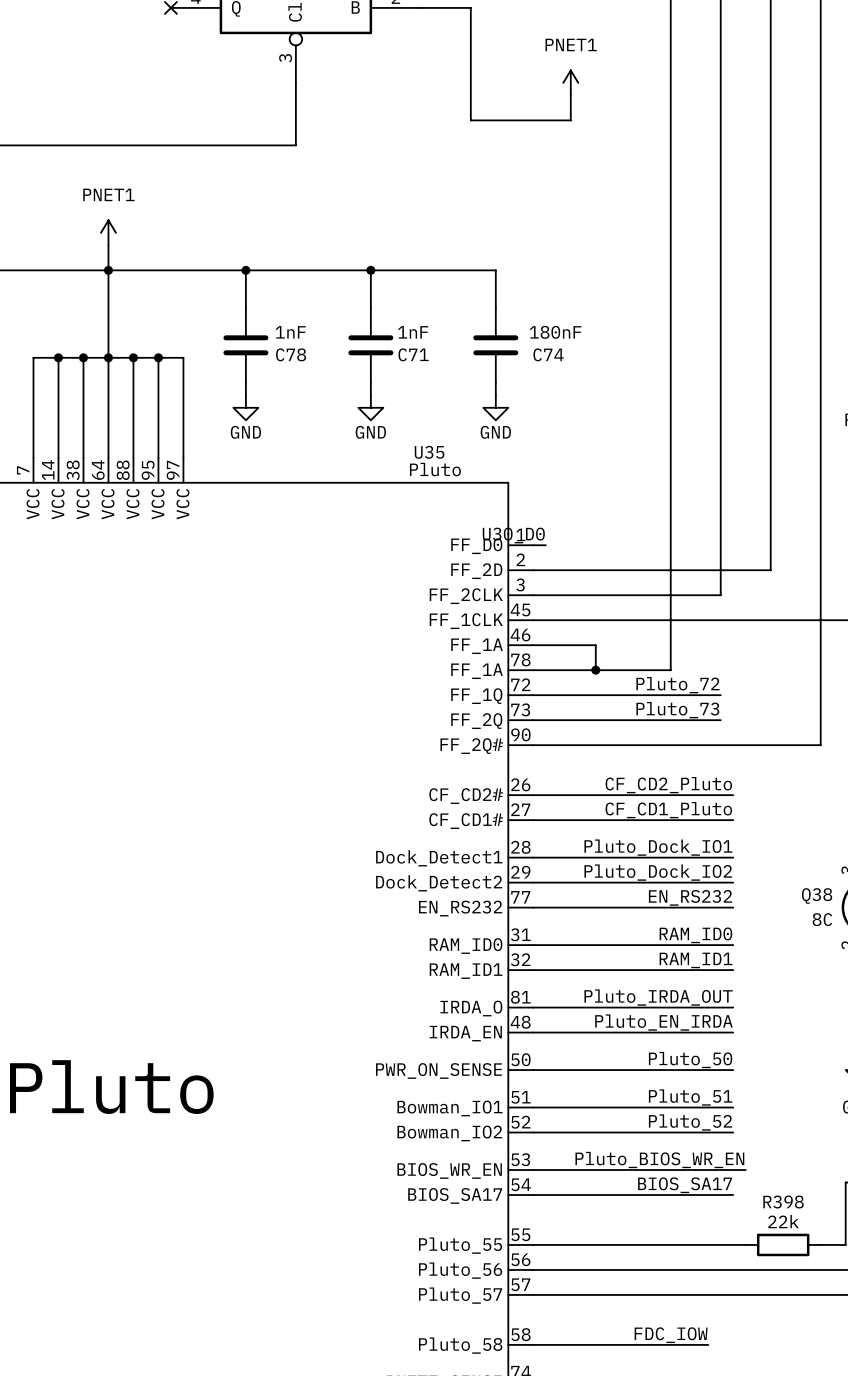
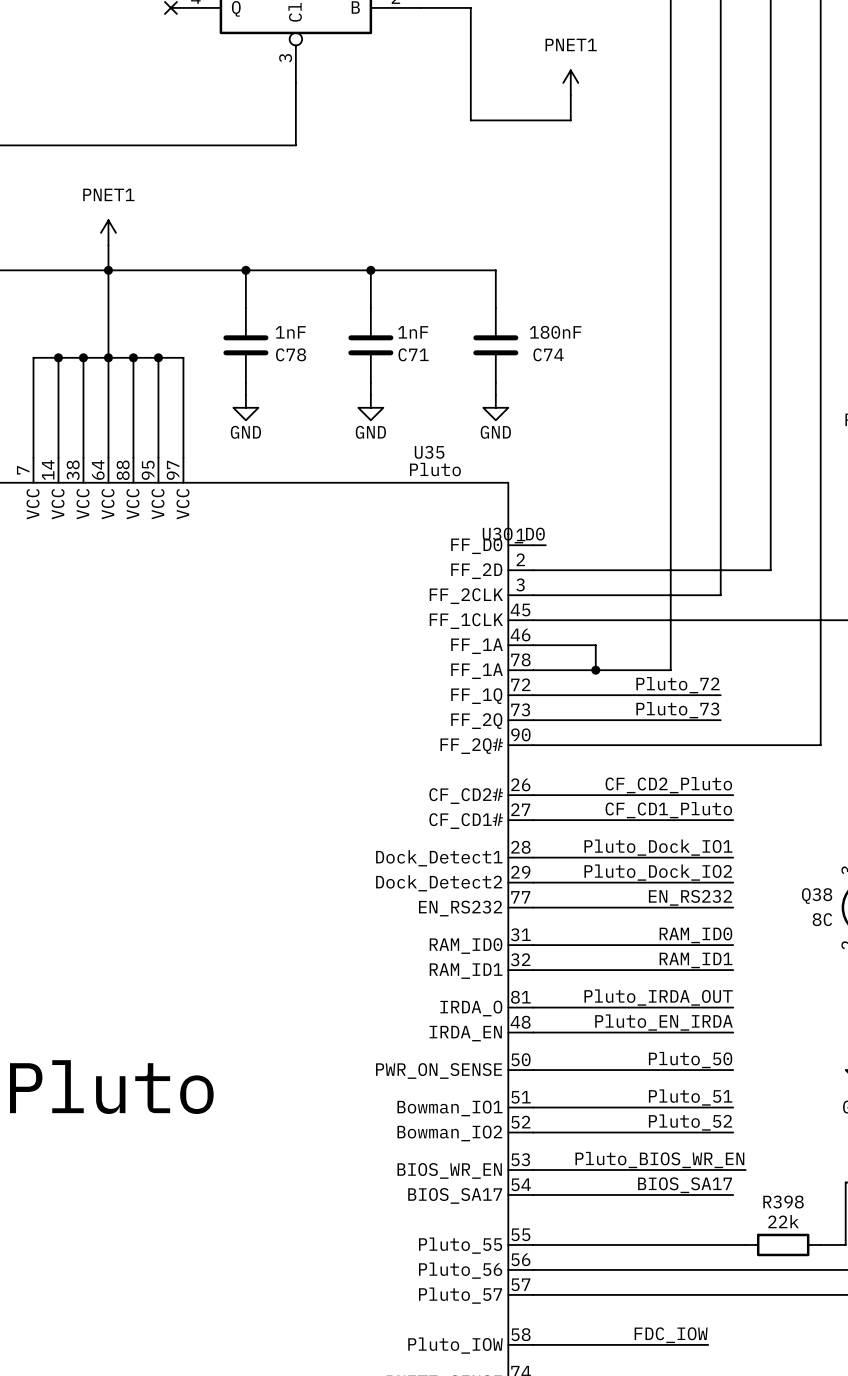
U35 pin name: Pluto_58 (460, 1345) -> Pluto_IOW (455, 1345)

